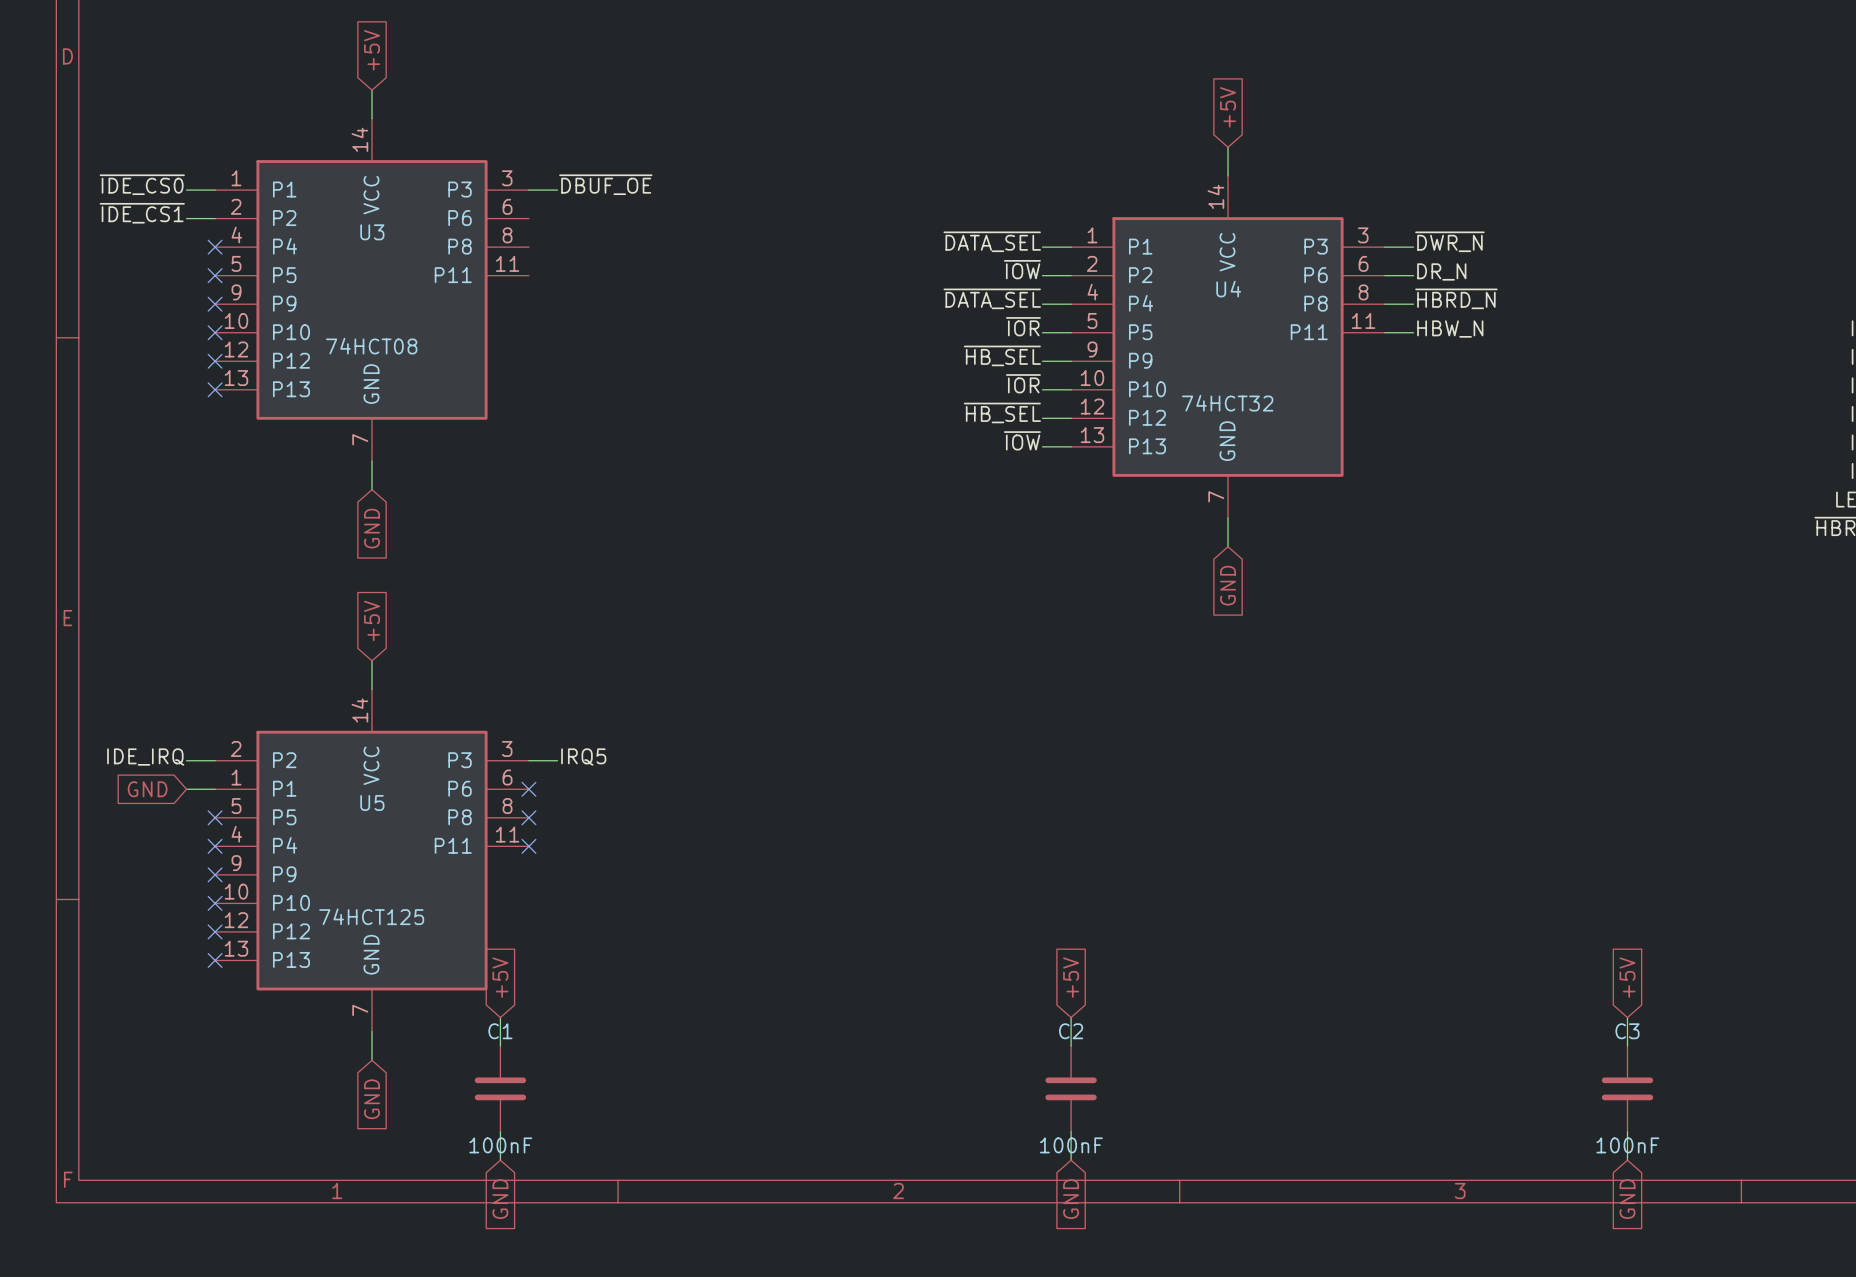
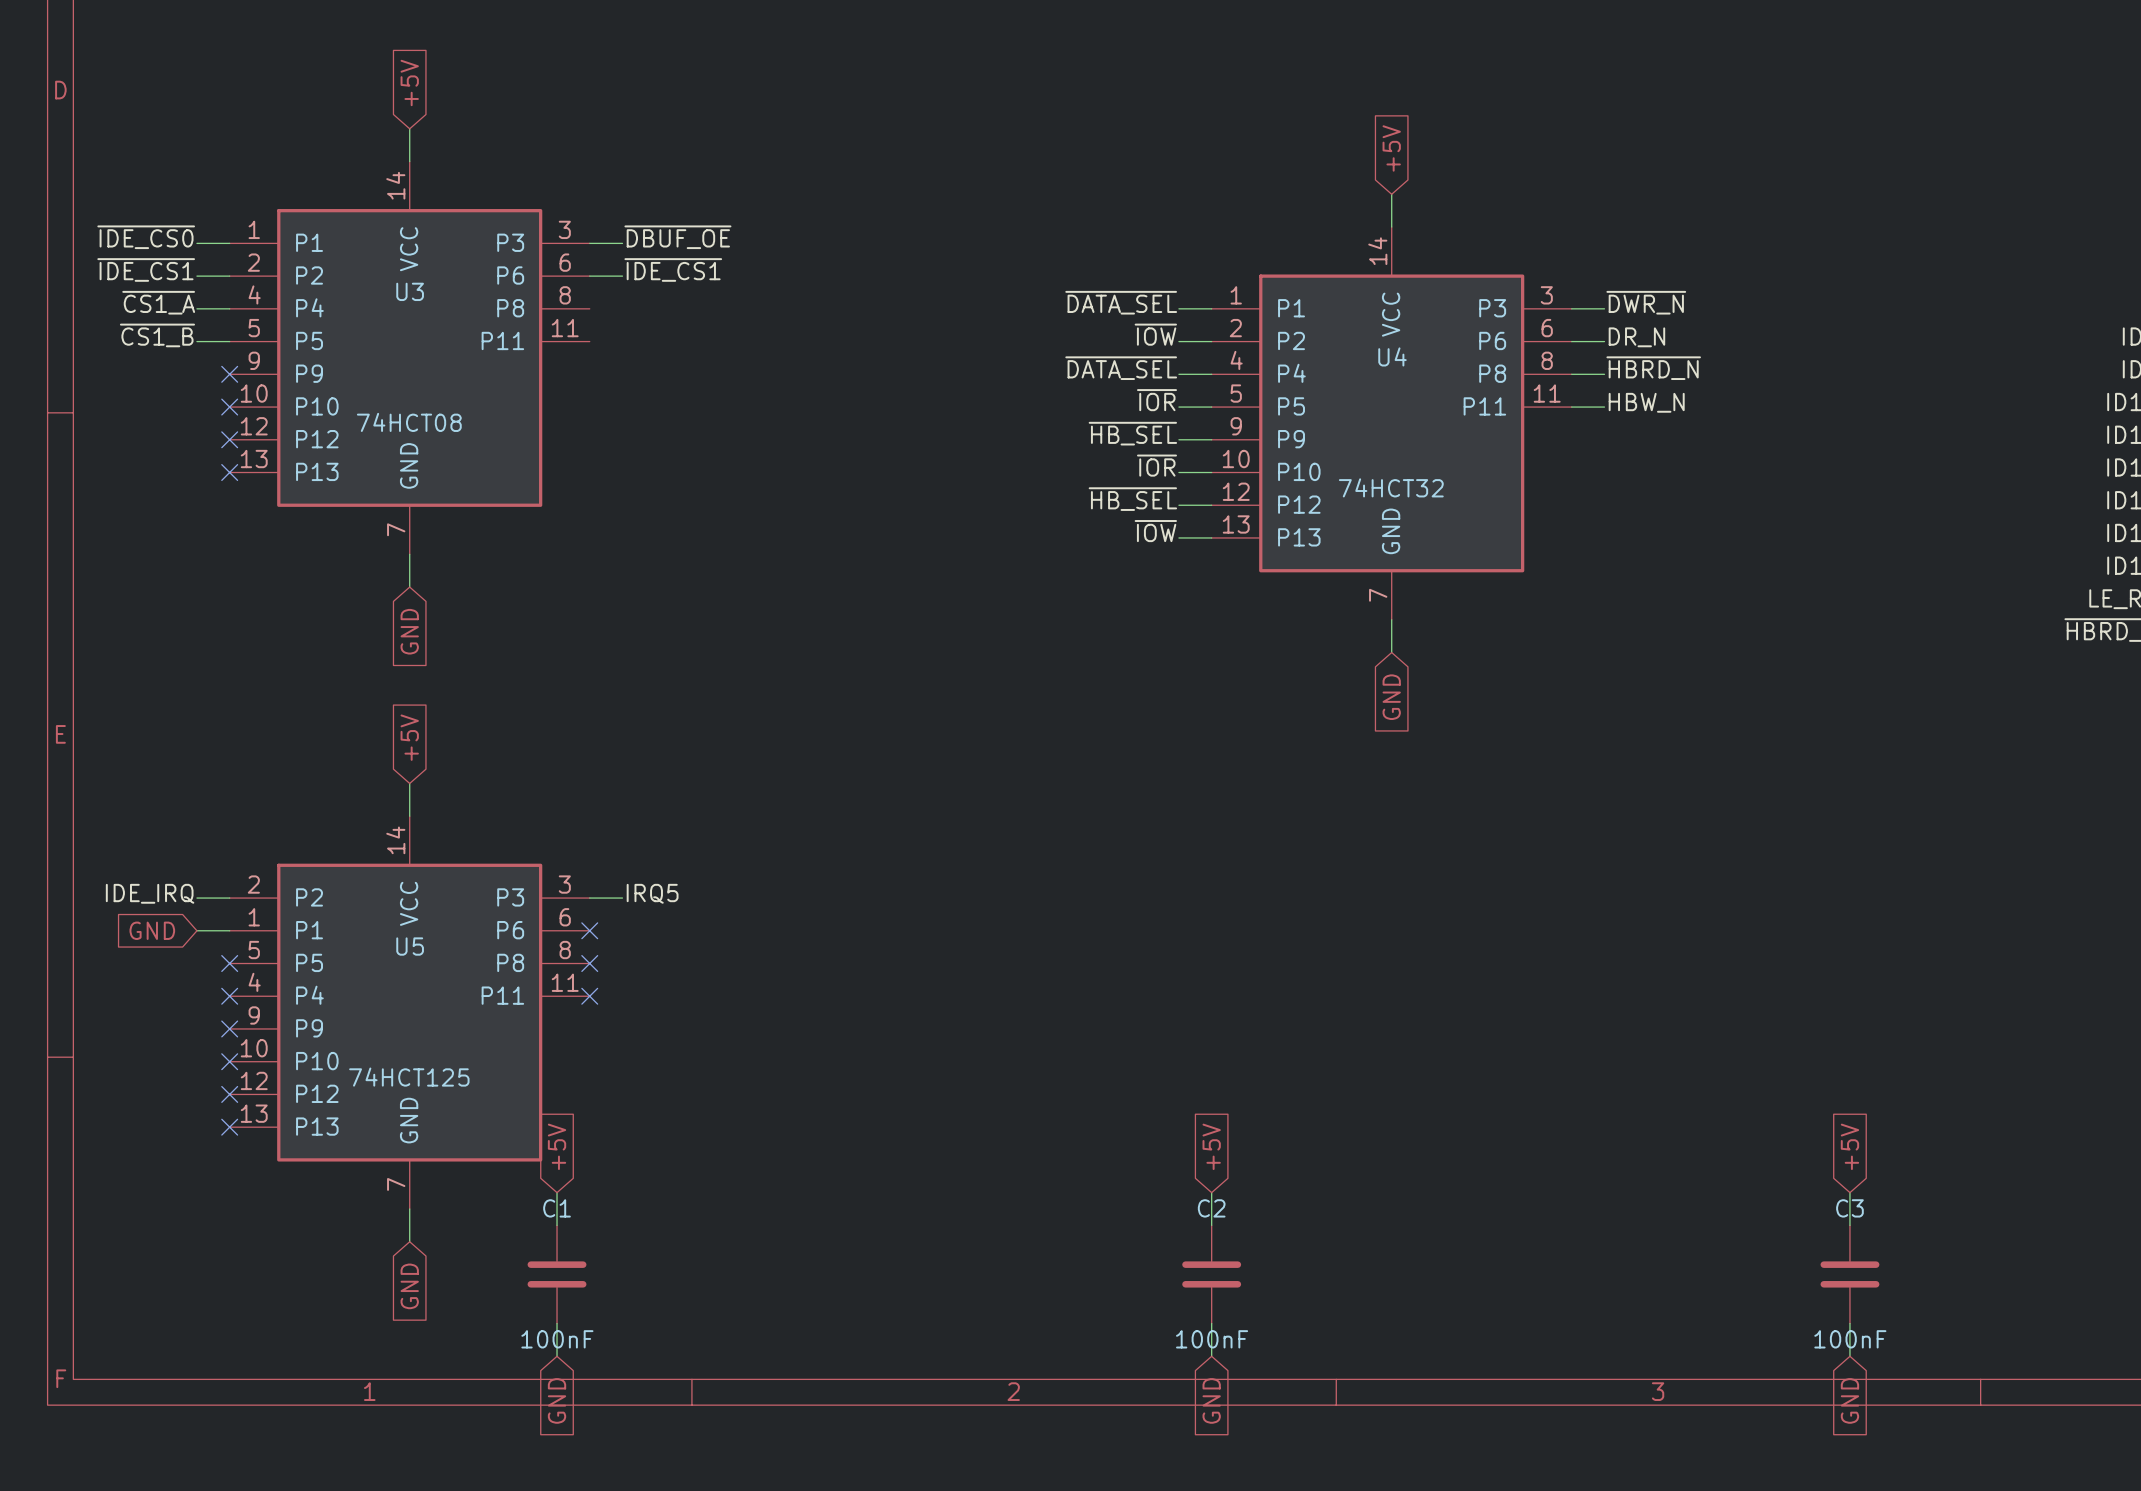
label: none -> ~{IDE_CS1} (673, 269)
wire: none -> (589, 276) (622, 276)
label: none -> ~{CS1_A} (158, 302)
wire: none -> (196, 308) (229, 308)
no-connect mark: (215, 247) -> none
label: none -> ~{CS1_B} (157, 335)
wire: none -> (196, 341) (229, 341)
no-connect mark: (215, 275) -> none

